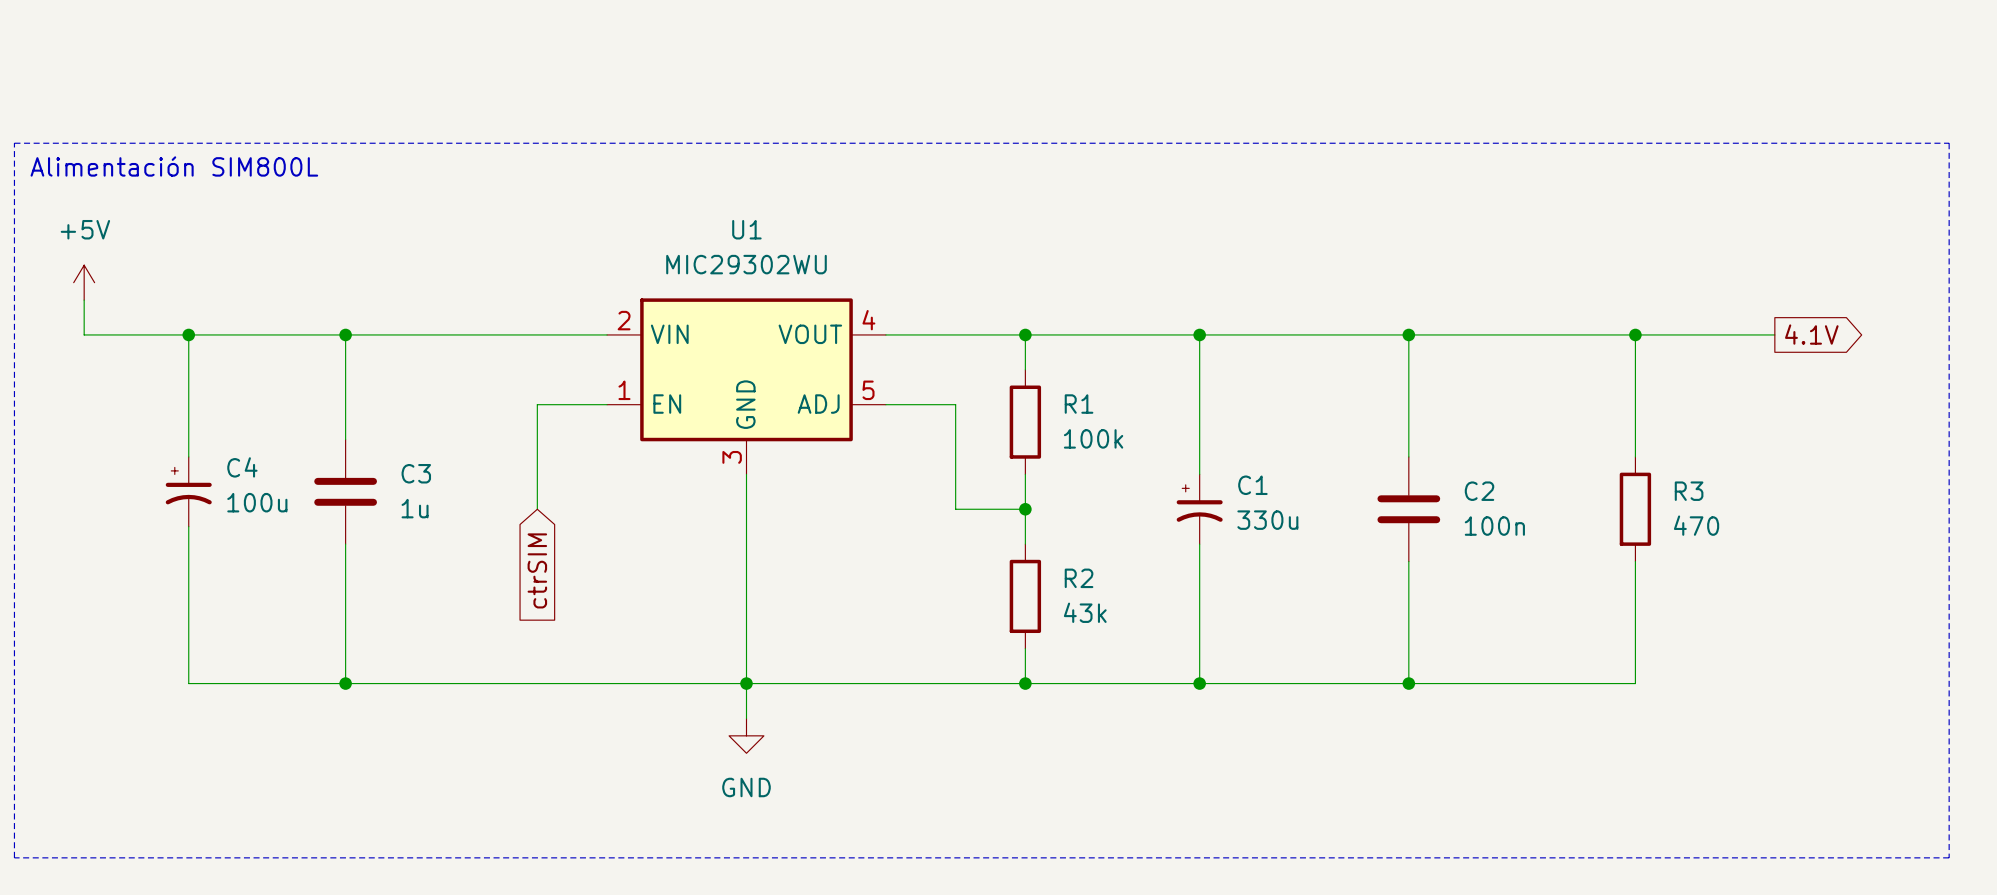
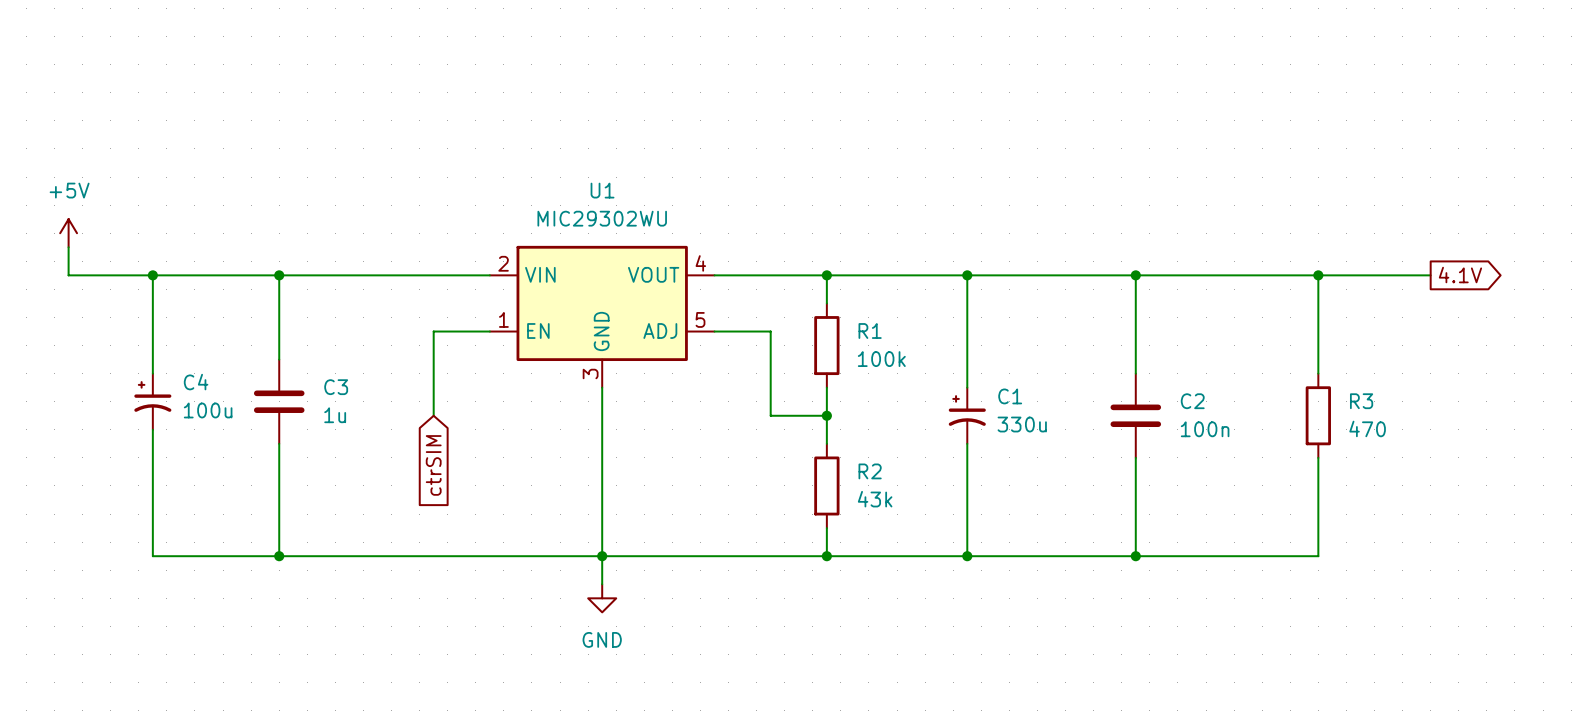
line: (14, 143) (1949, 143) (1949, 857) (14, 857) (14, 143) -> none
text: Alimentación SIM800L (174, 166) -> none

